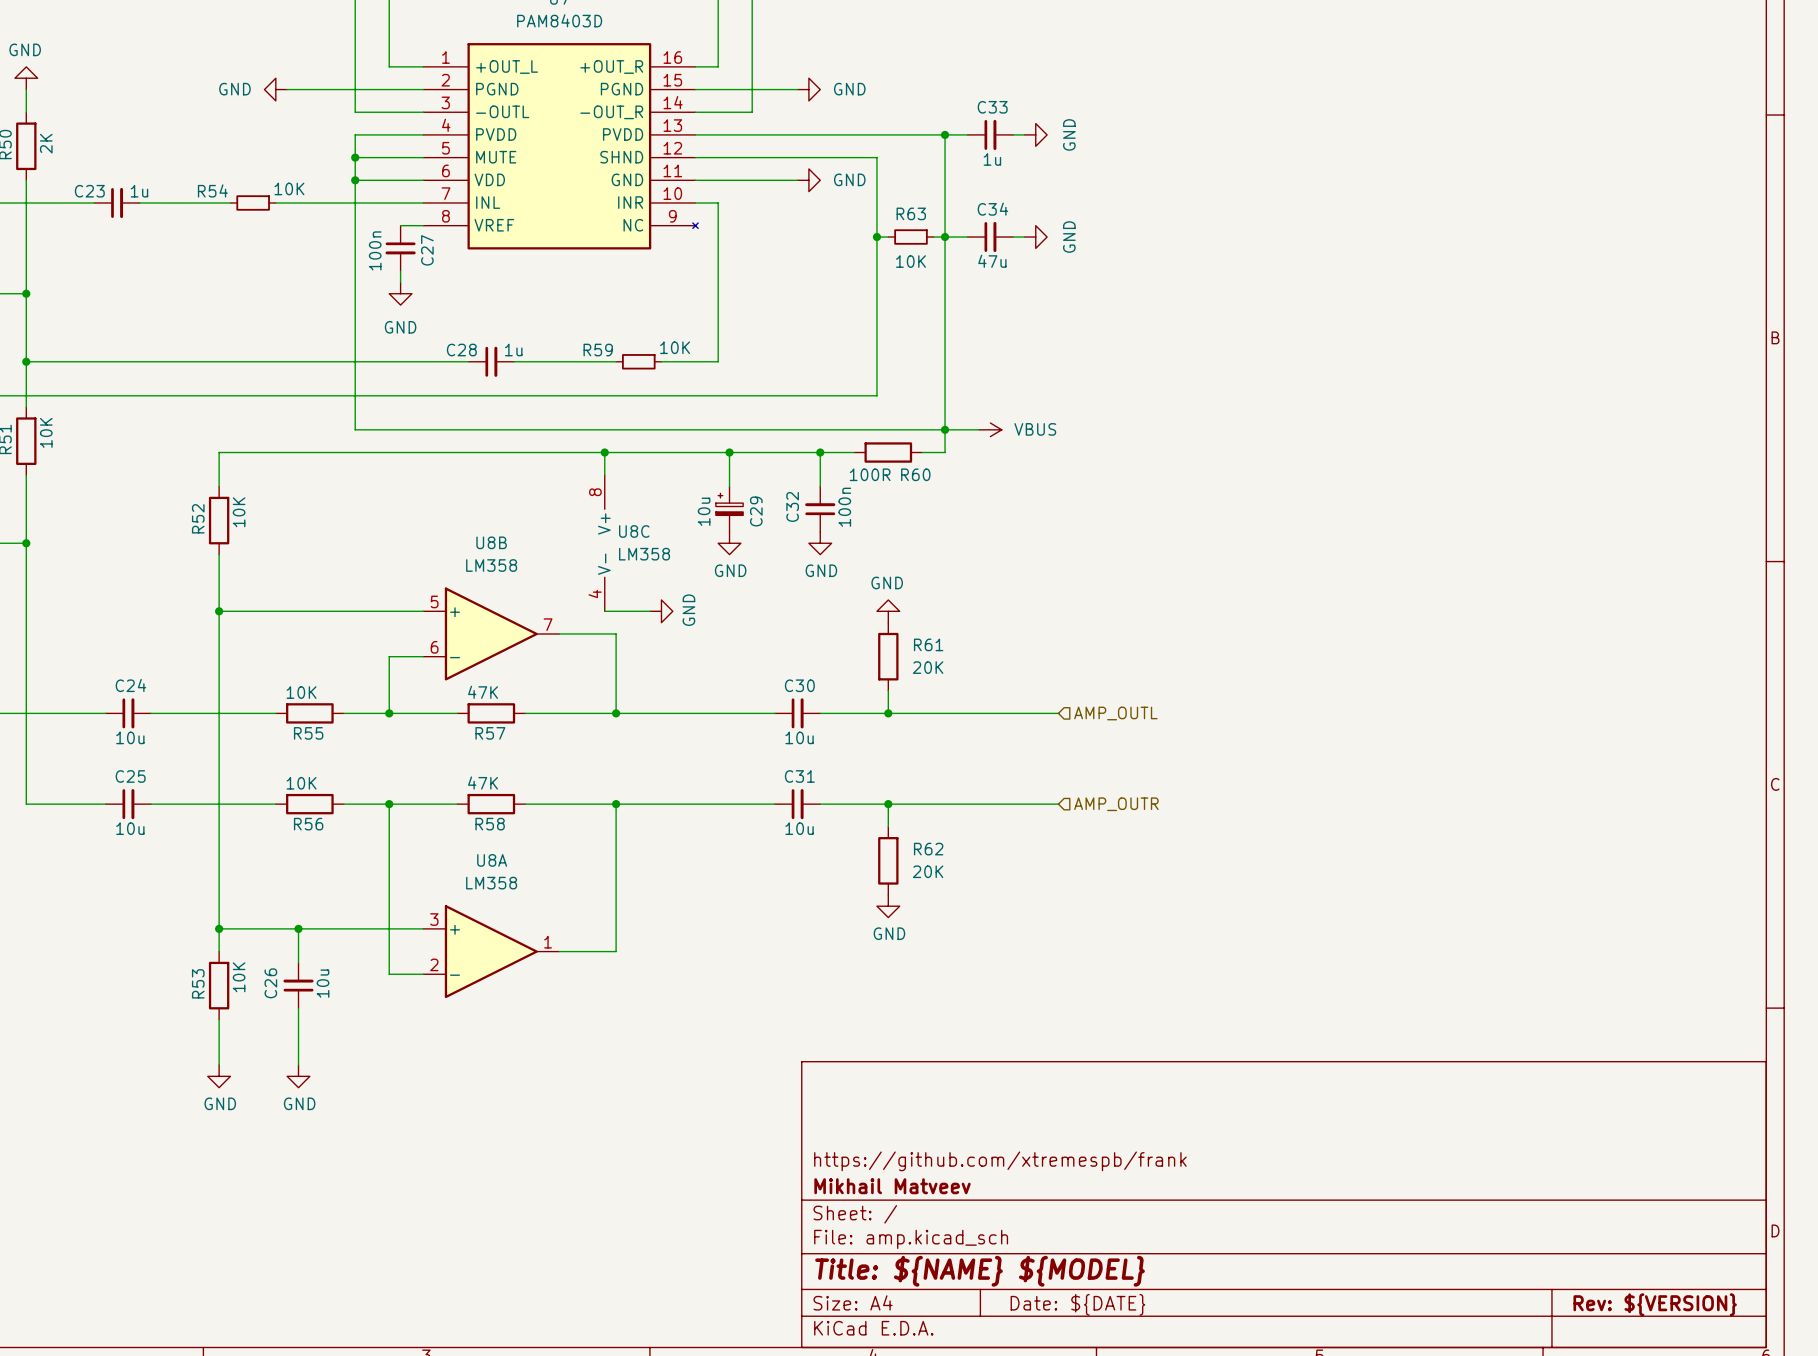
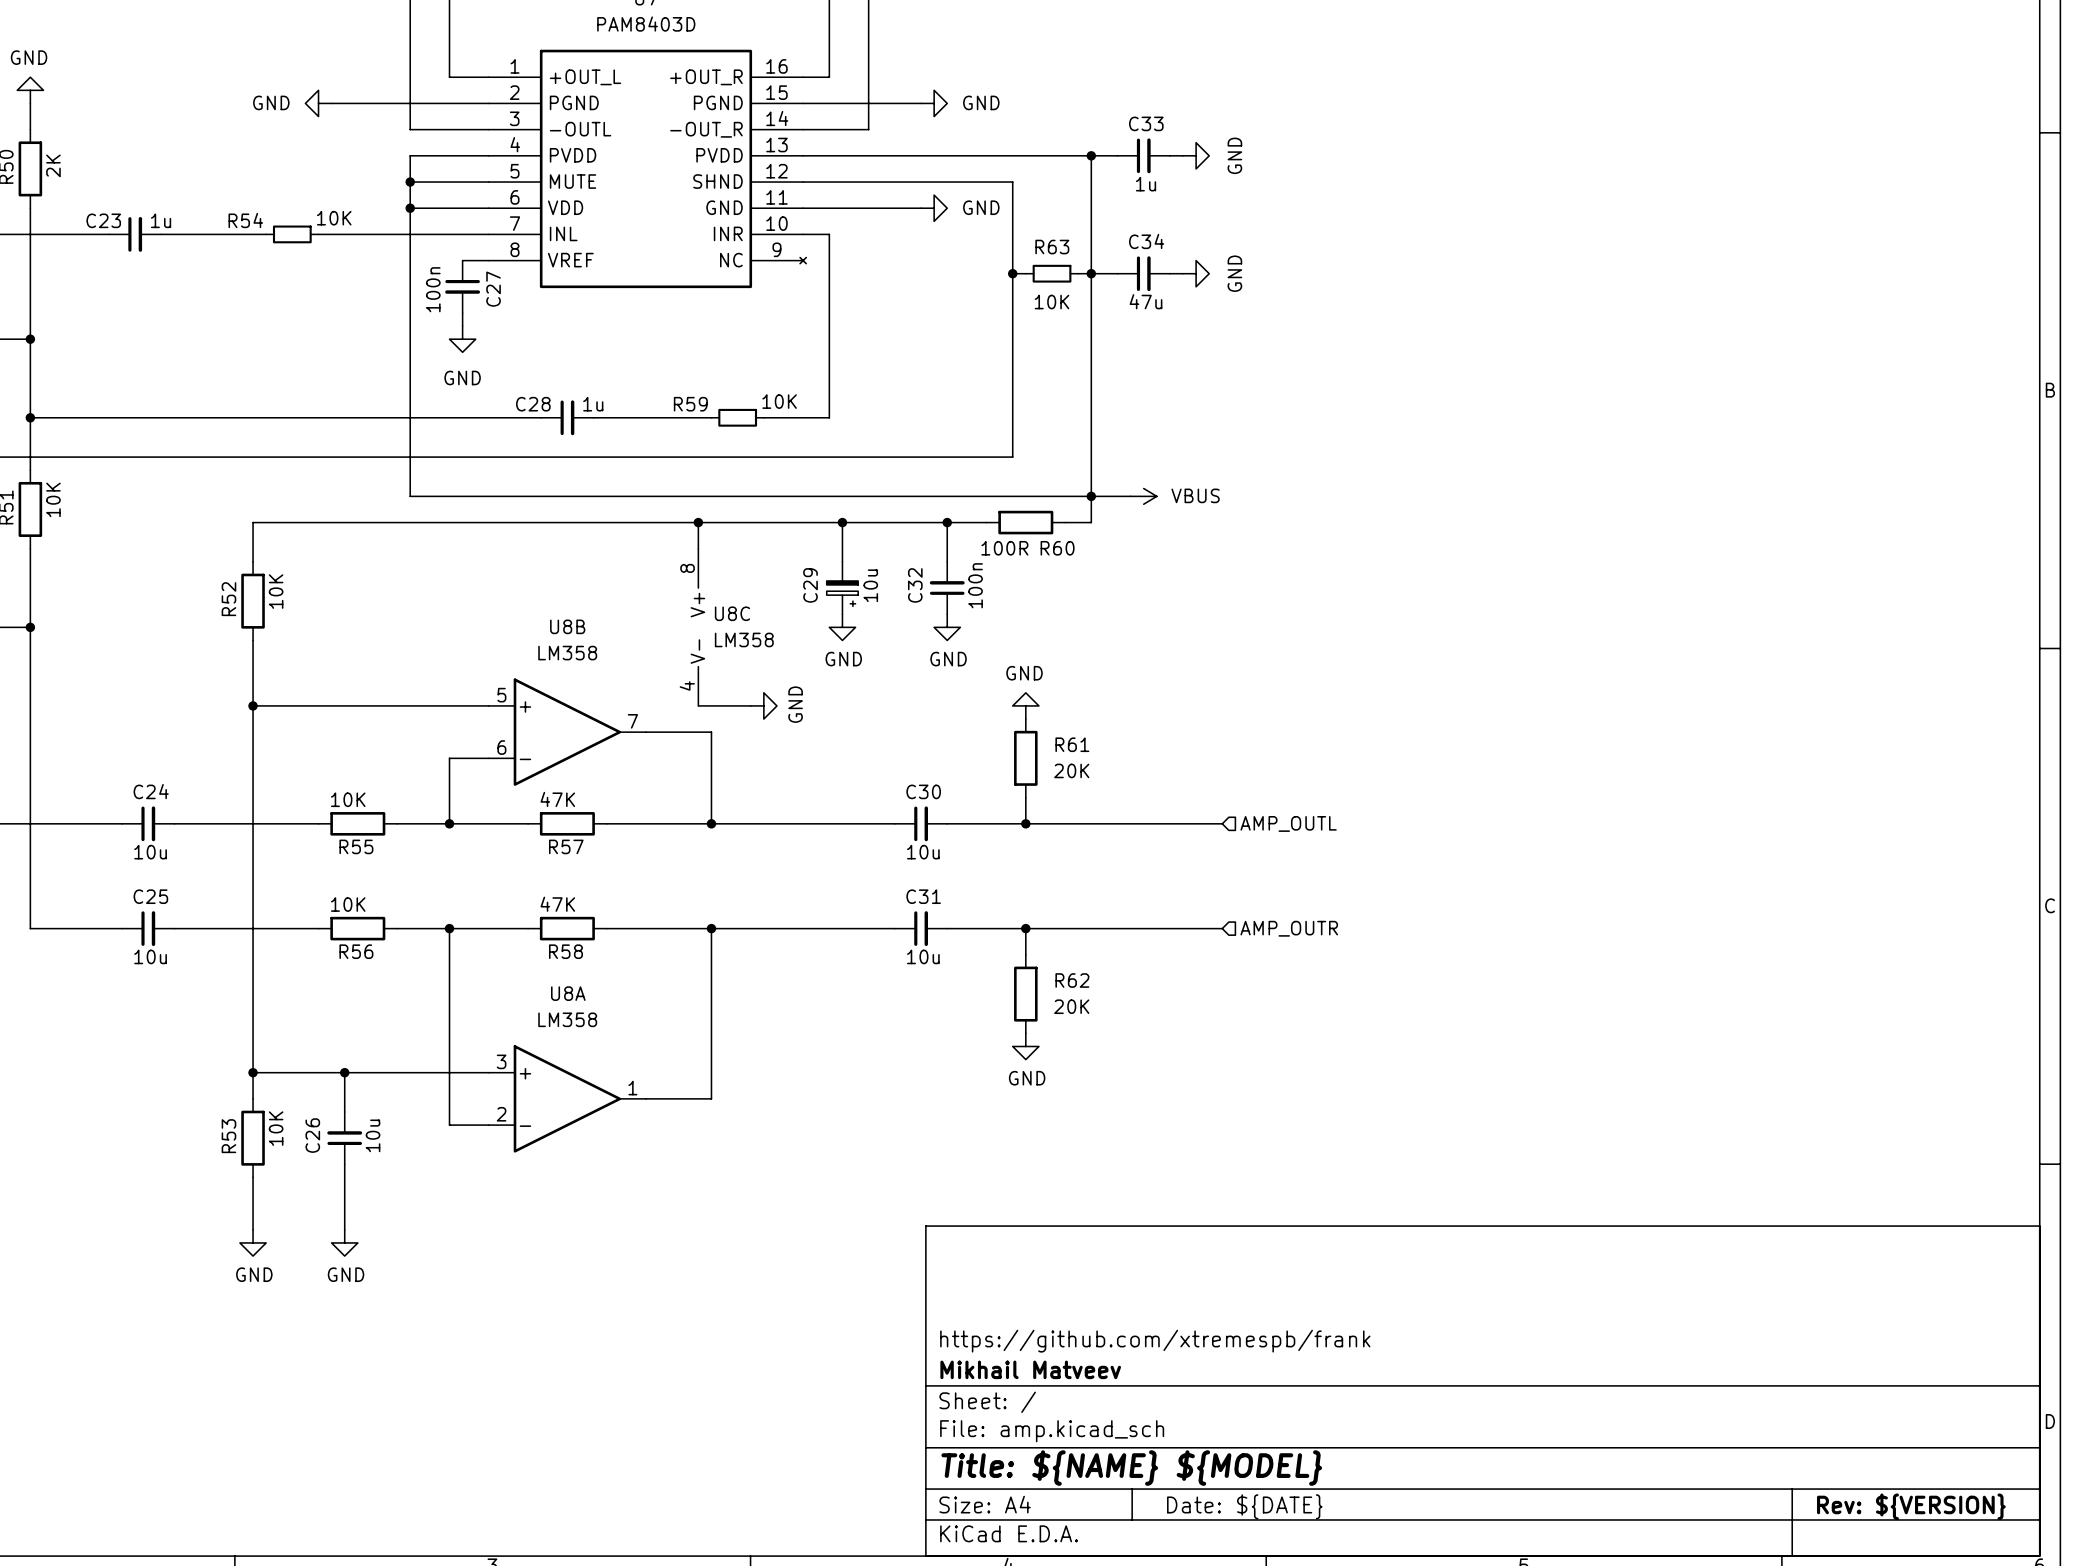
C29 rotation: 0° (729, 504) -> 180° (842, 593)

